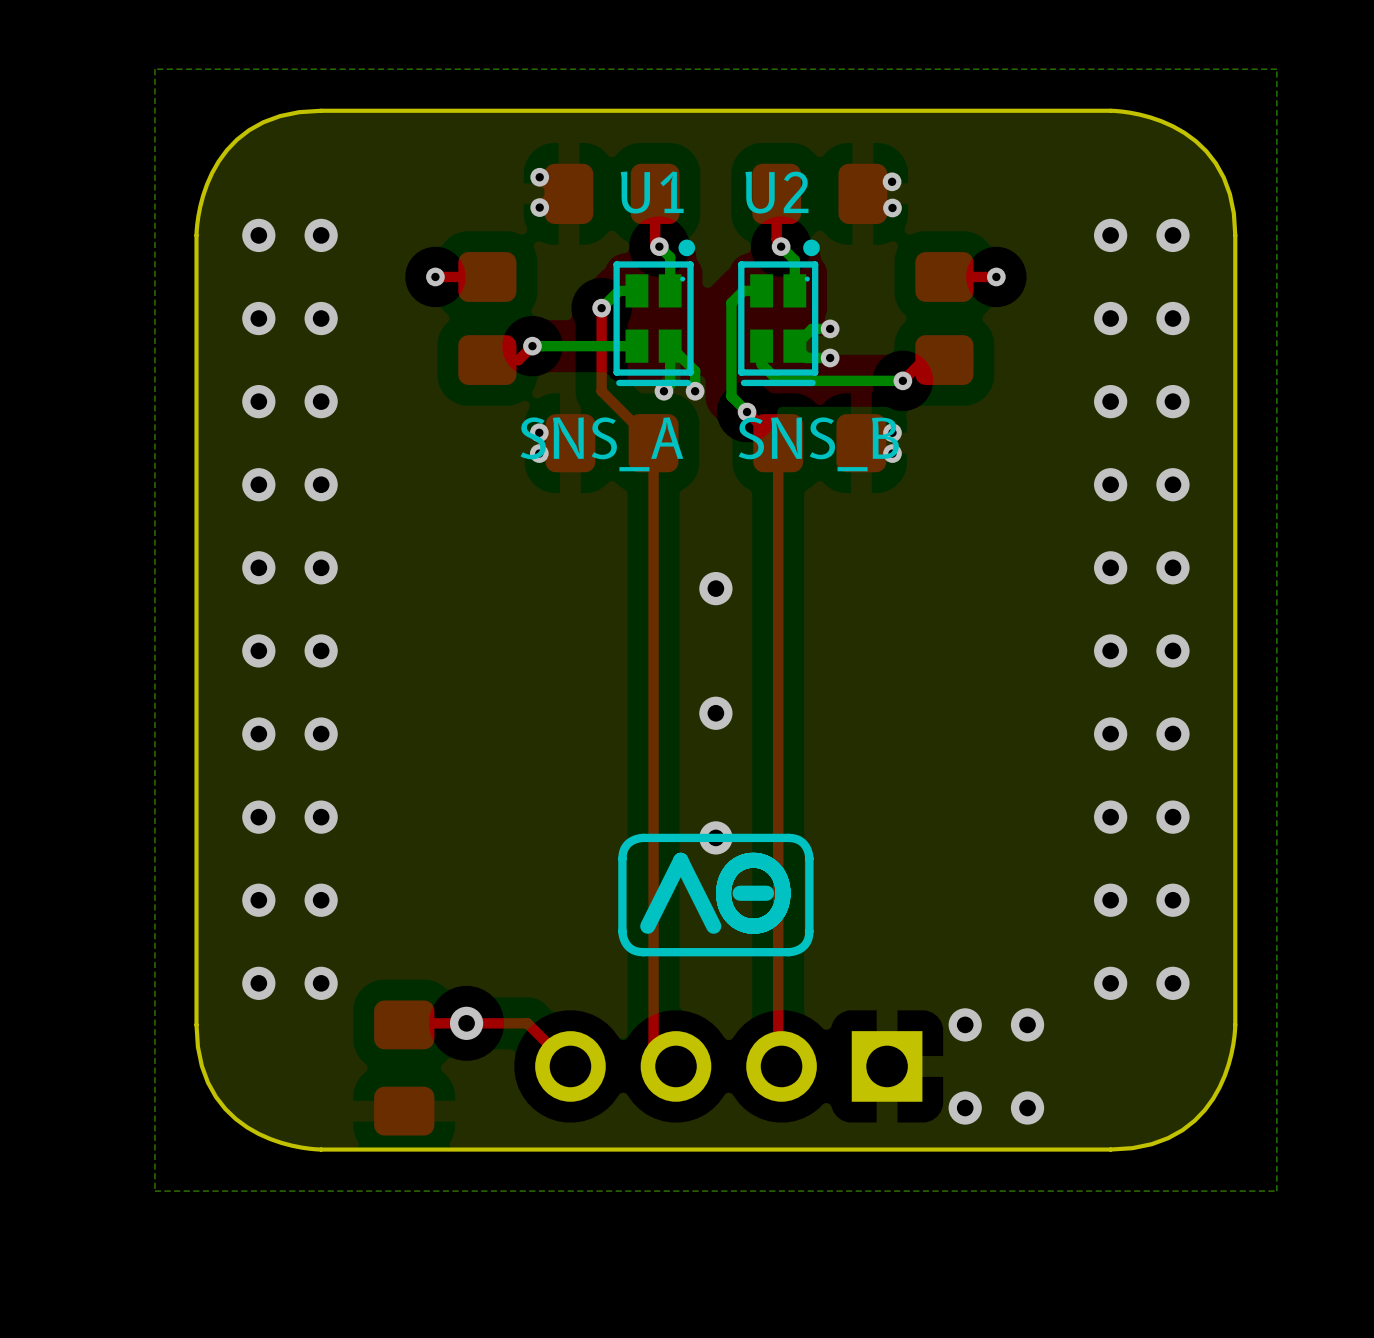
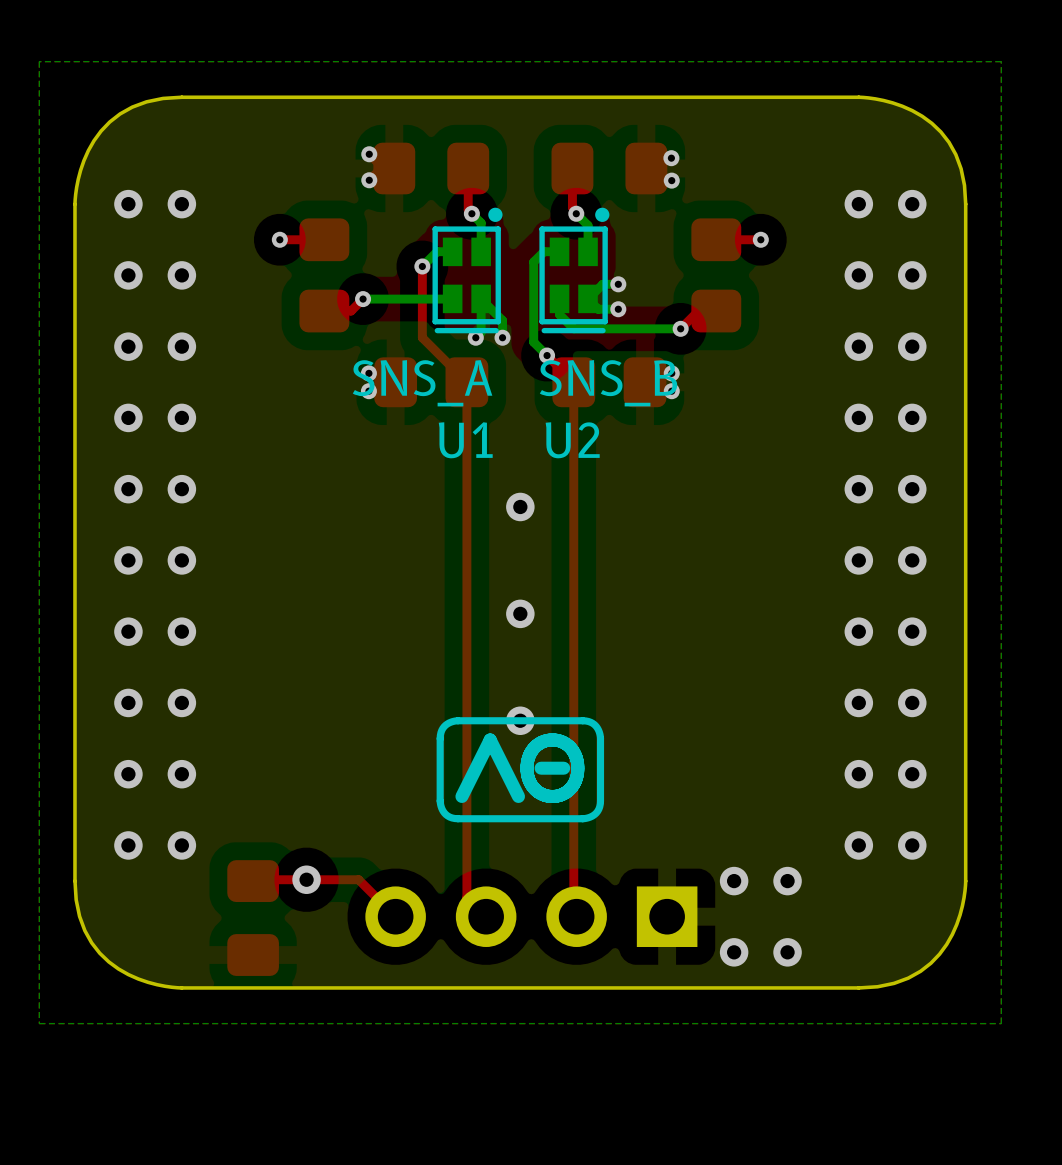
U1 name position: U1 (652, 192) -> U1 (465, 440)
U2 name position: U2 (776, 192) -> U2 (572, 440)
U1 footprint: [613, 239, 696, 387] -> [432, 207, 503, 334]
U2 footprint: [738, 239, 820, 387] -> [539, 207, 610, 334]

